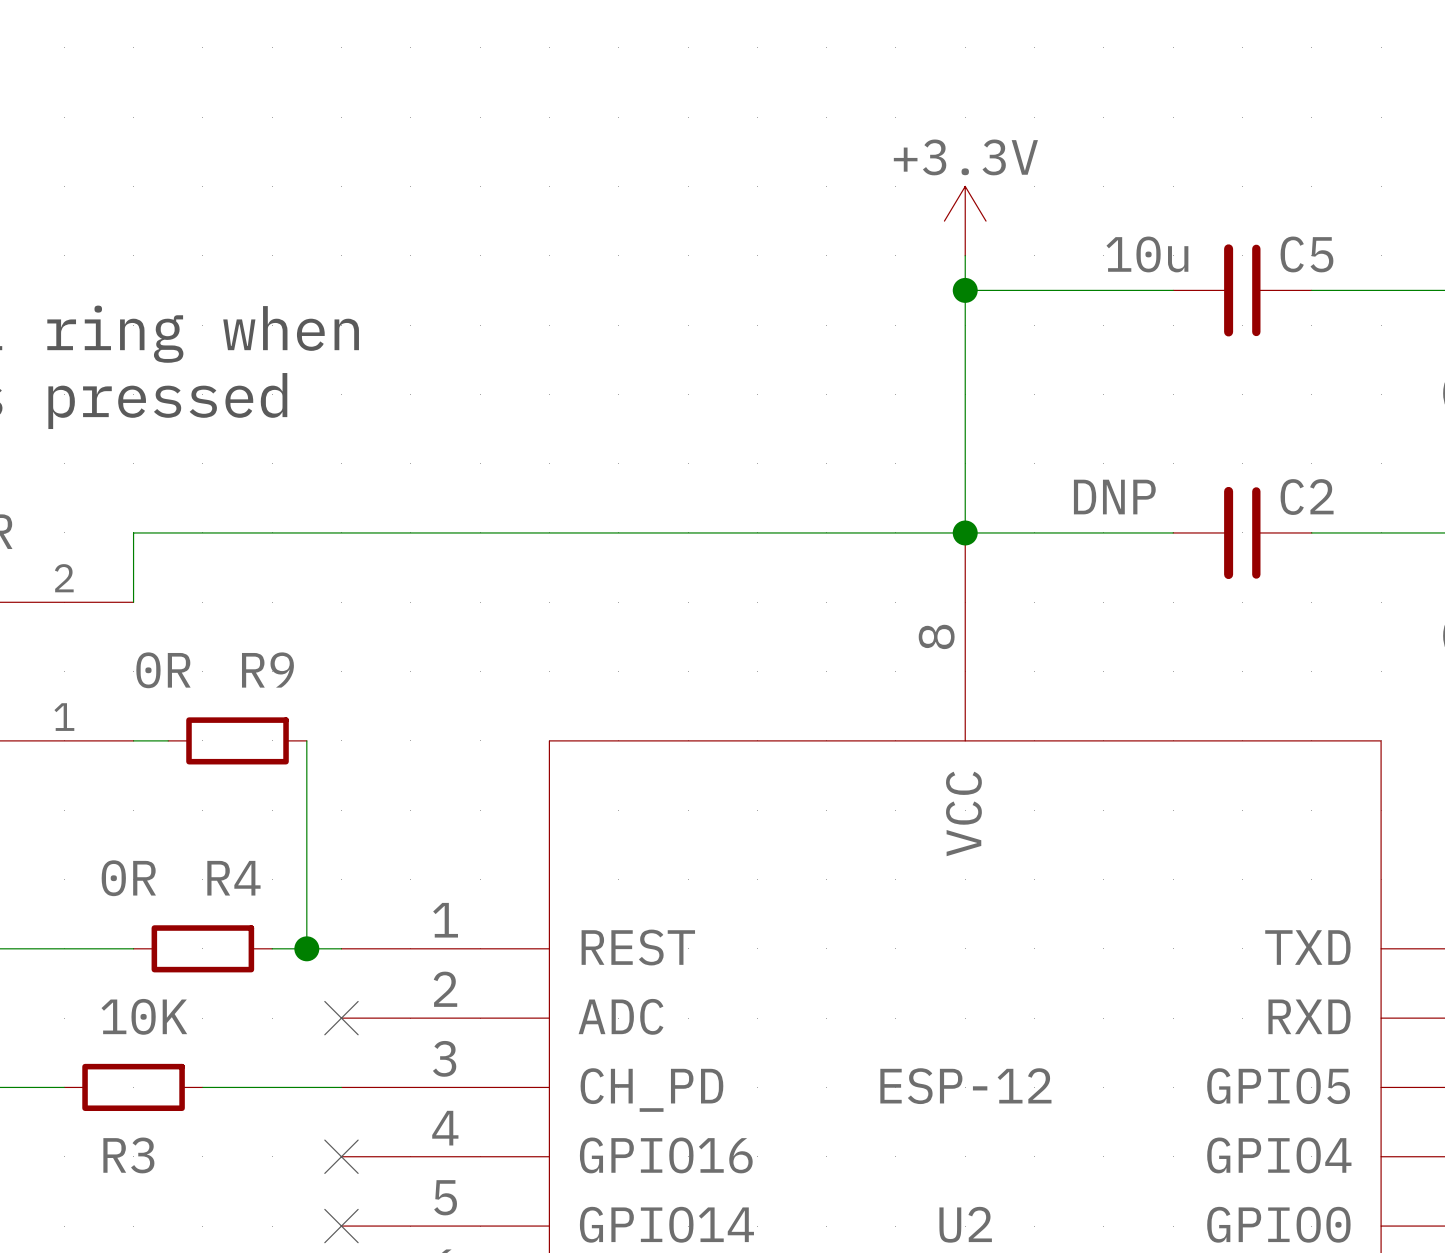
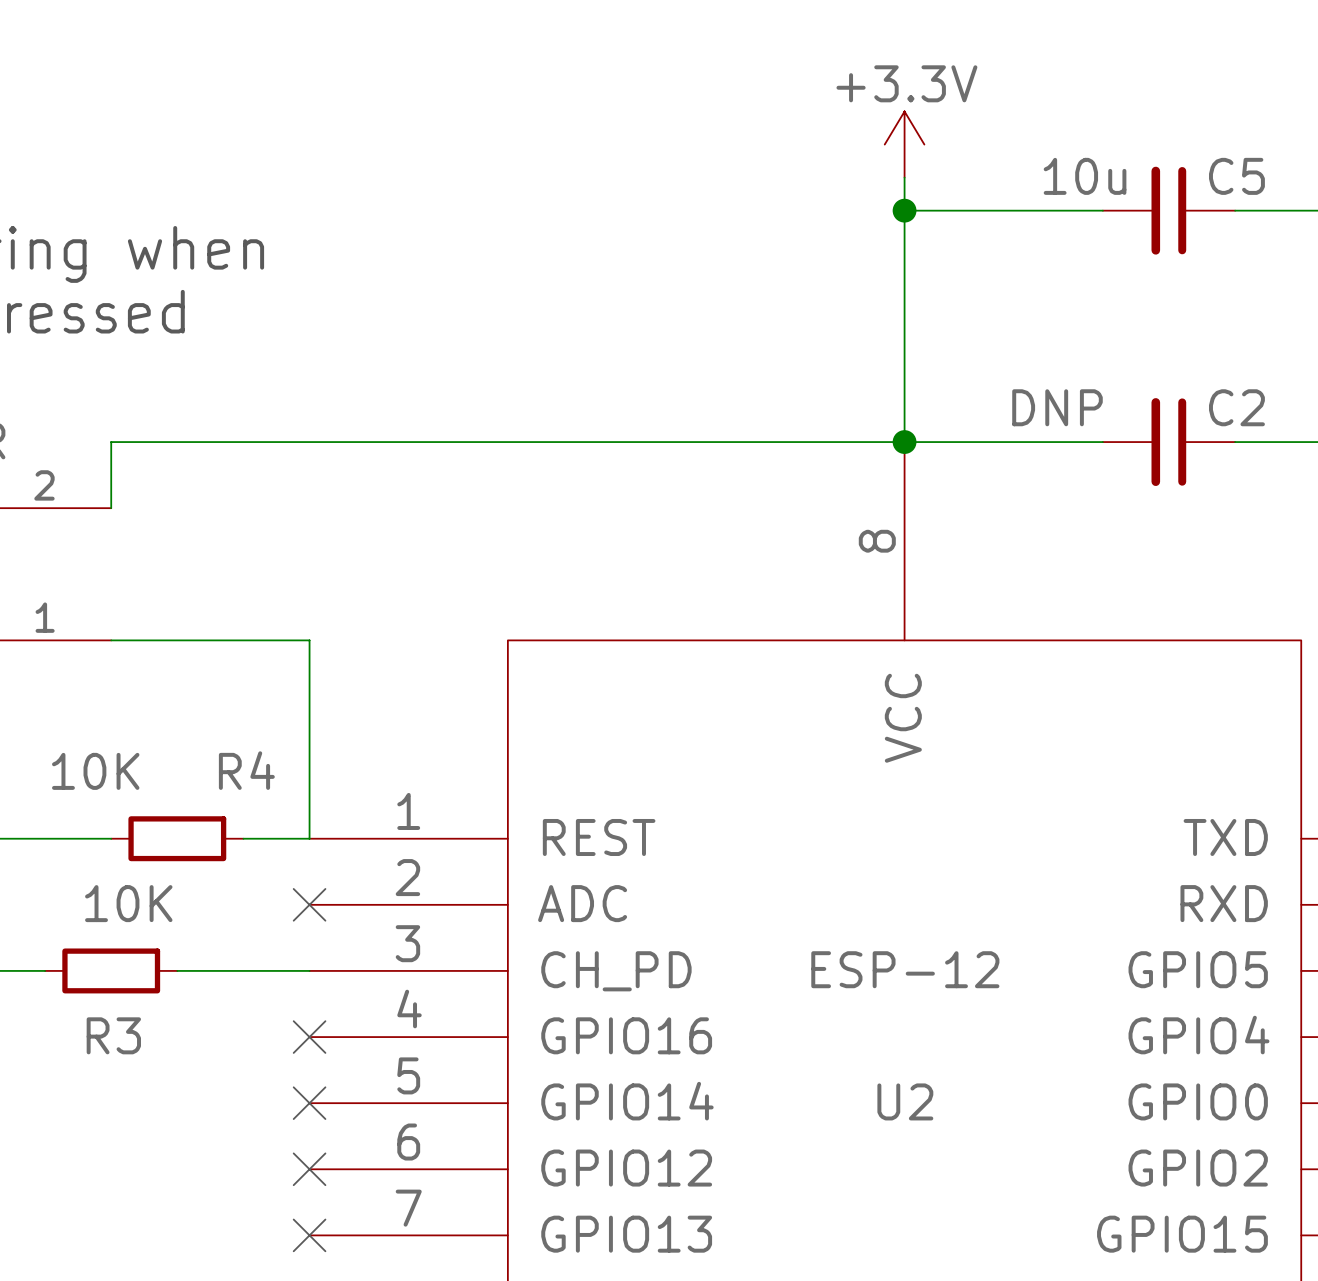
wire: none -> (144, 640) (309, 640) (309, 838)
R9: 0R (237, 740) -> none
wire: (306, 740) (306, 948) -> none
R4 value: 0R (128, 878) -> 10K (95, 771)
R4 name position: R4 (233, 878) -> R4 (246, 770)
junction: (306, 948) -> none

